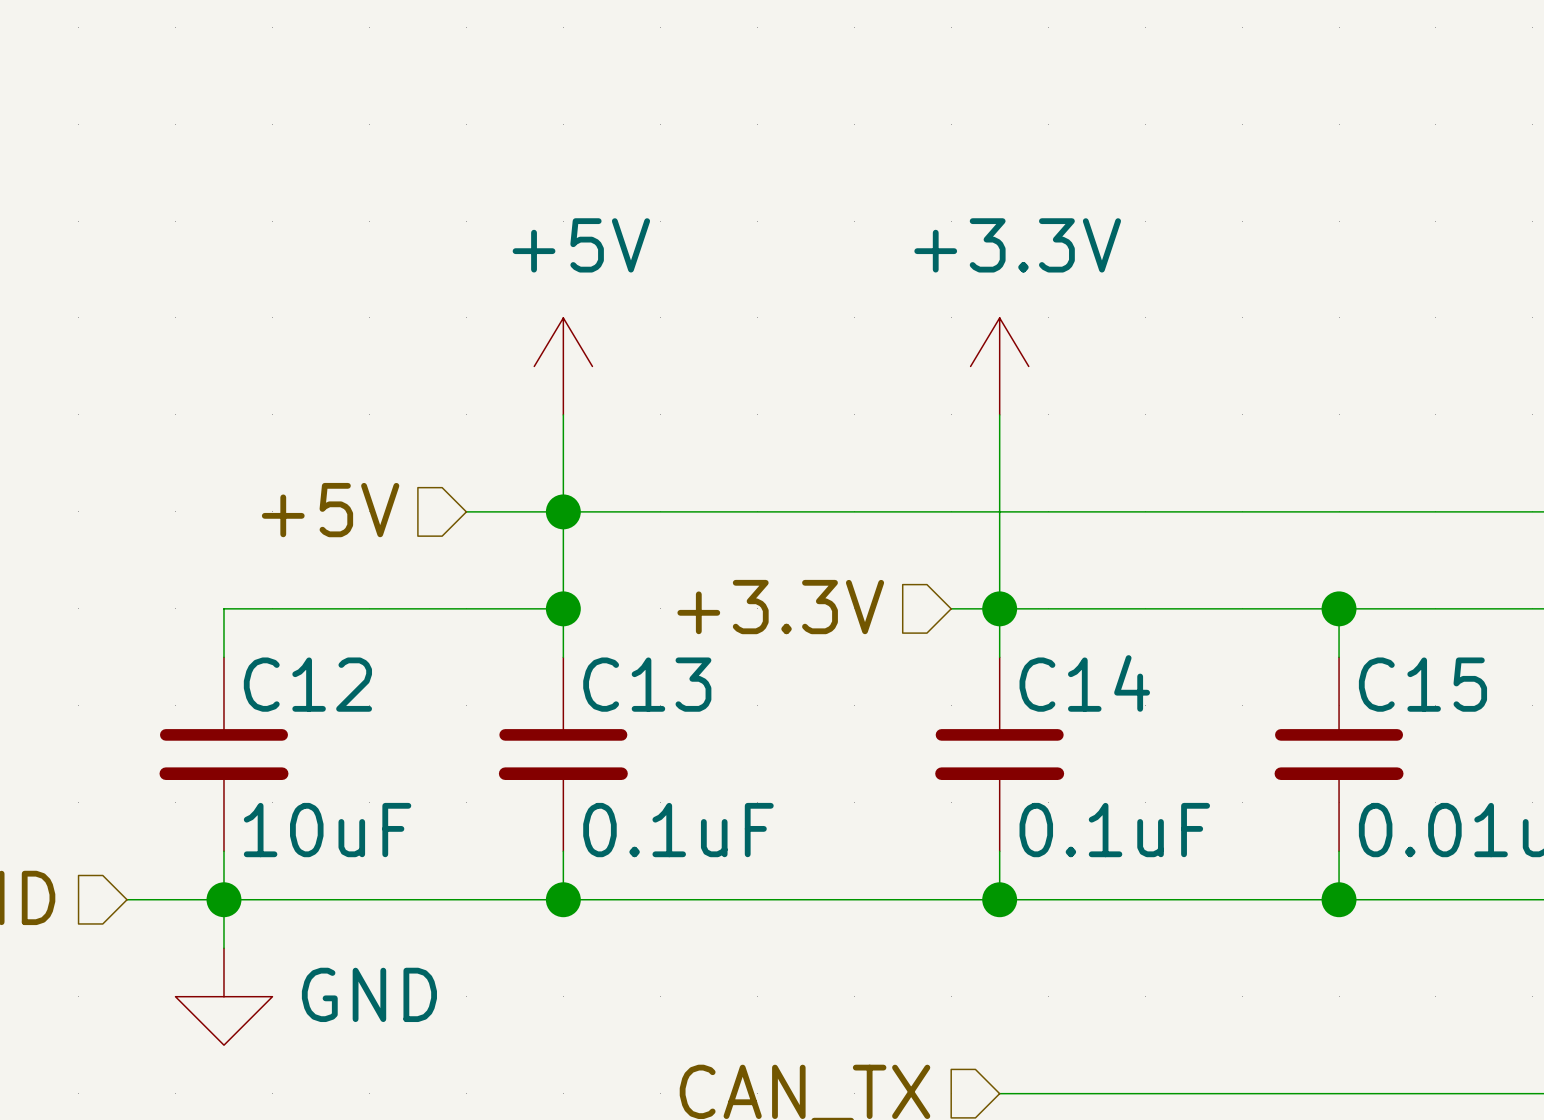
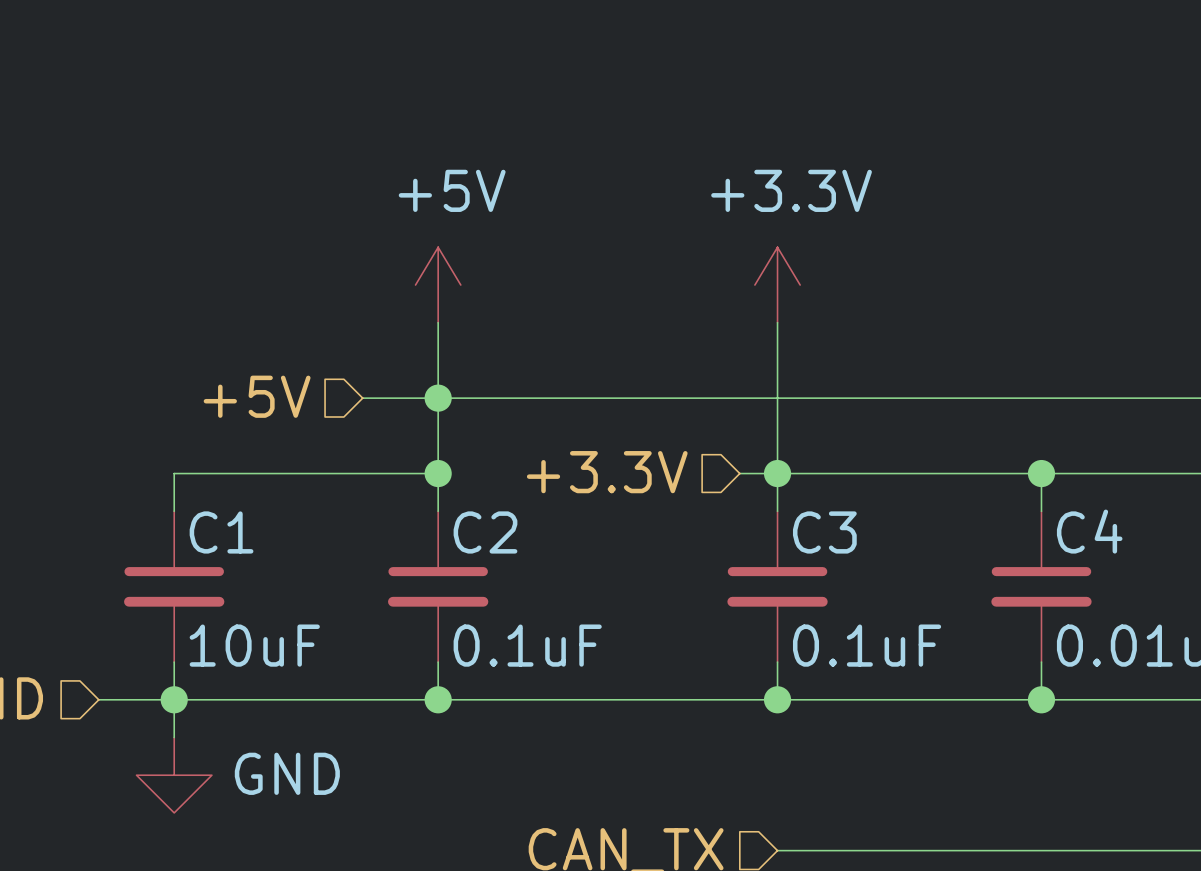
C14 name: C14 (1084, 683) -> C3 (824, 532)
C12 name: C12 (307, 684) -> C1 (221, 532)
C13 name: C13 (647, 684) -> C2 (485, 532)
C15 name: C15 (1422, 684) -> C4 (1089, 531)

